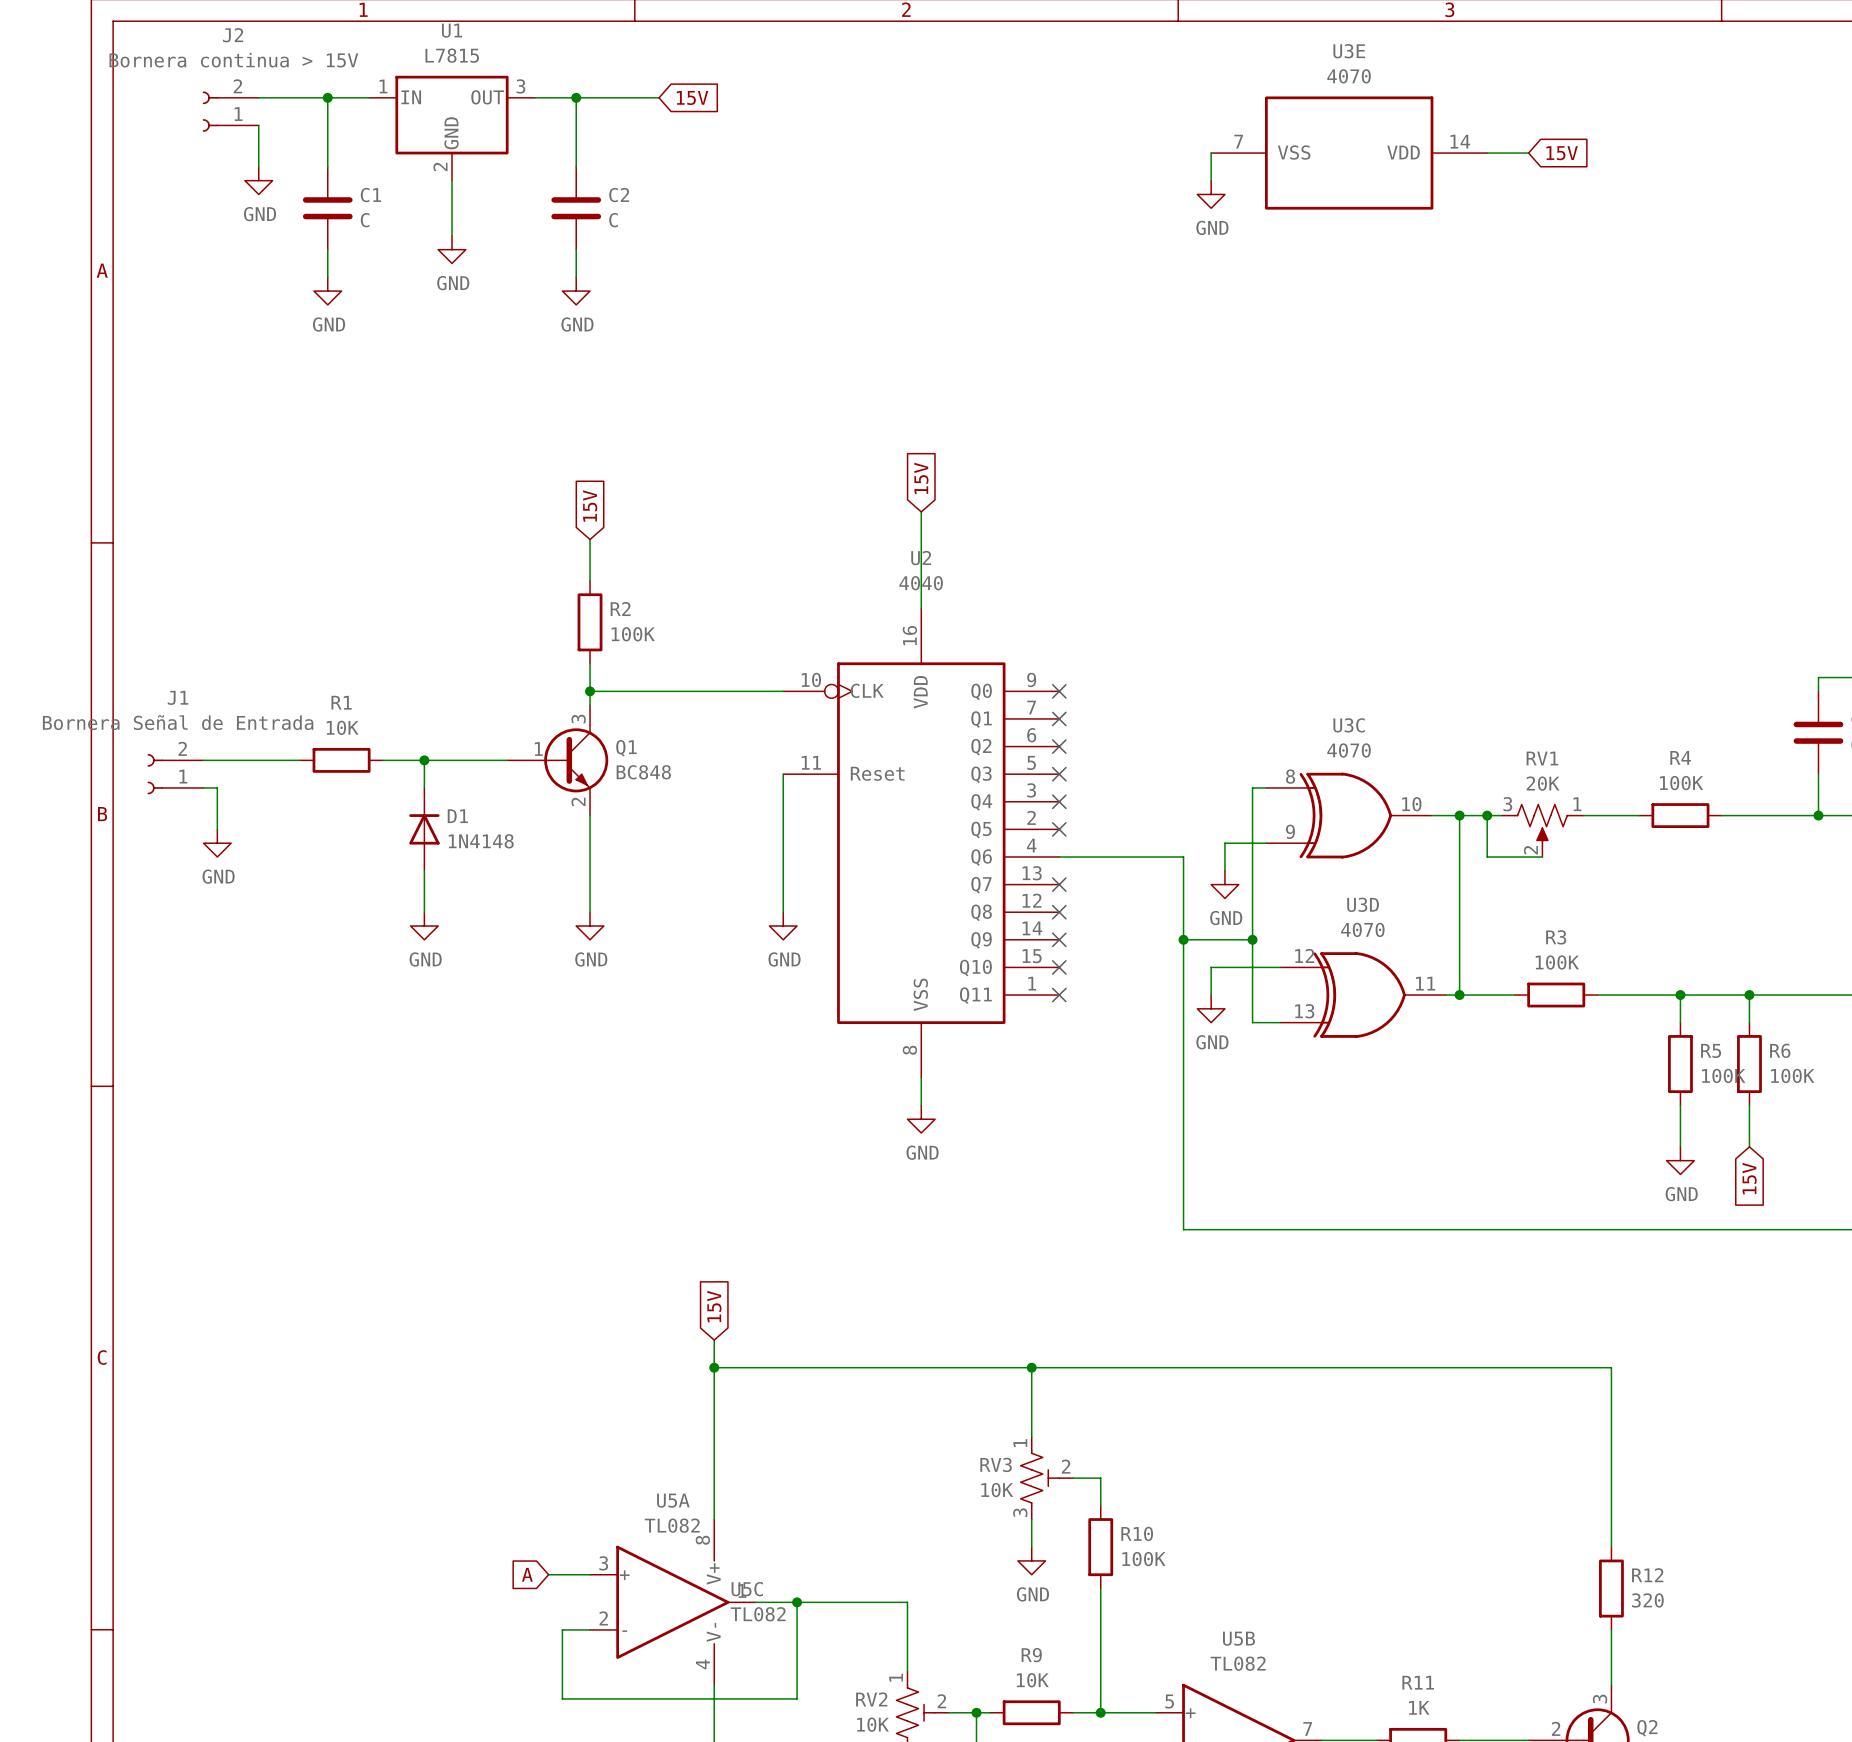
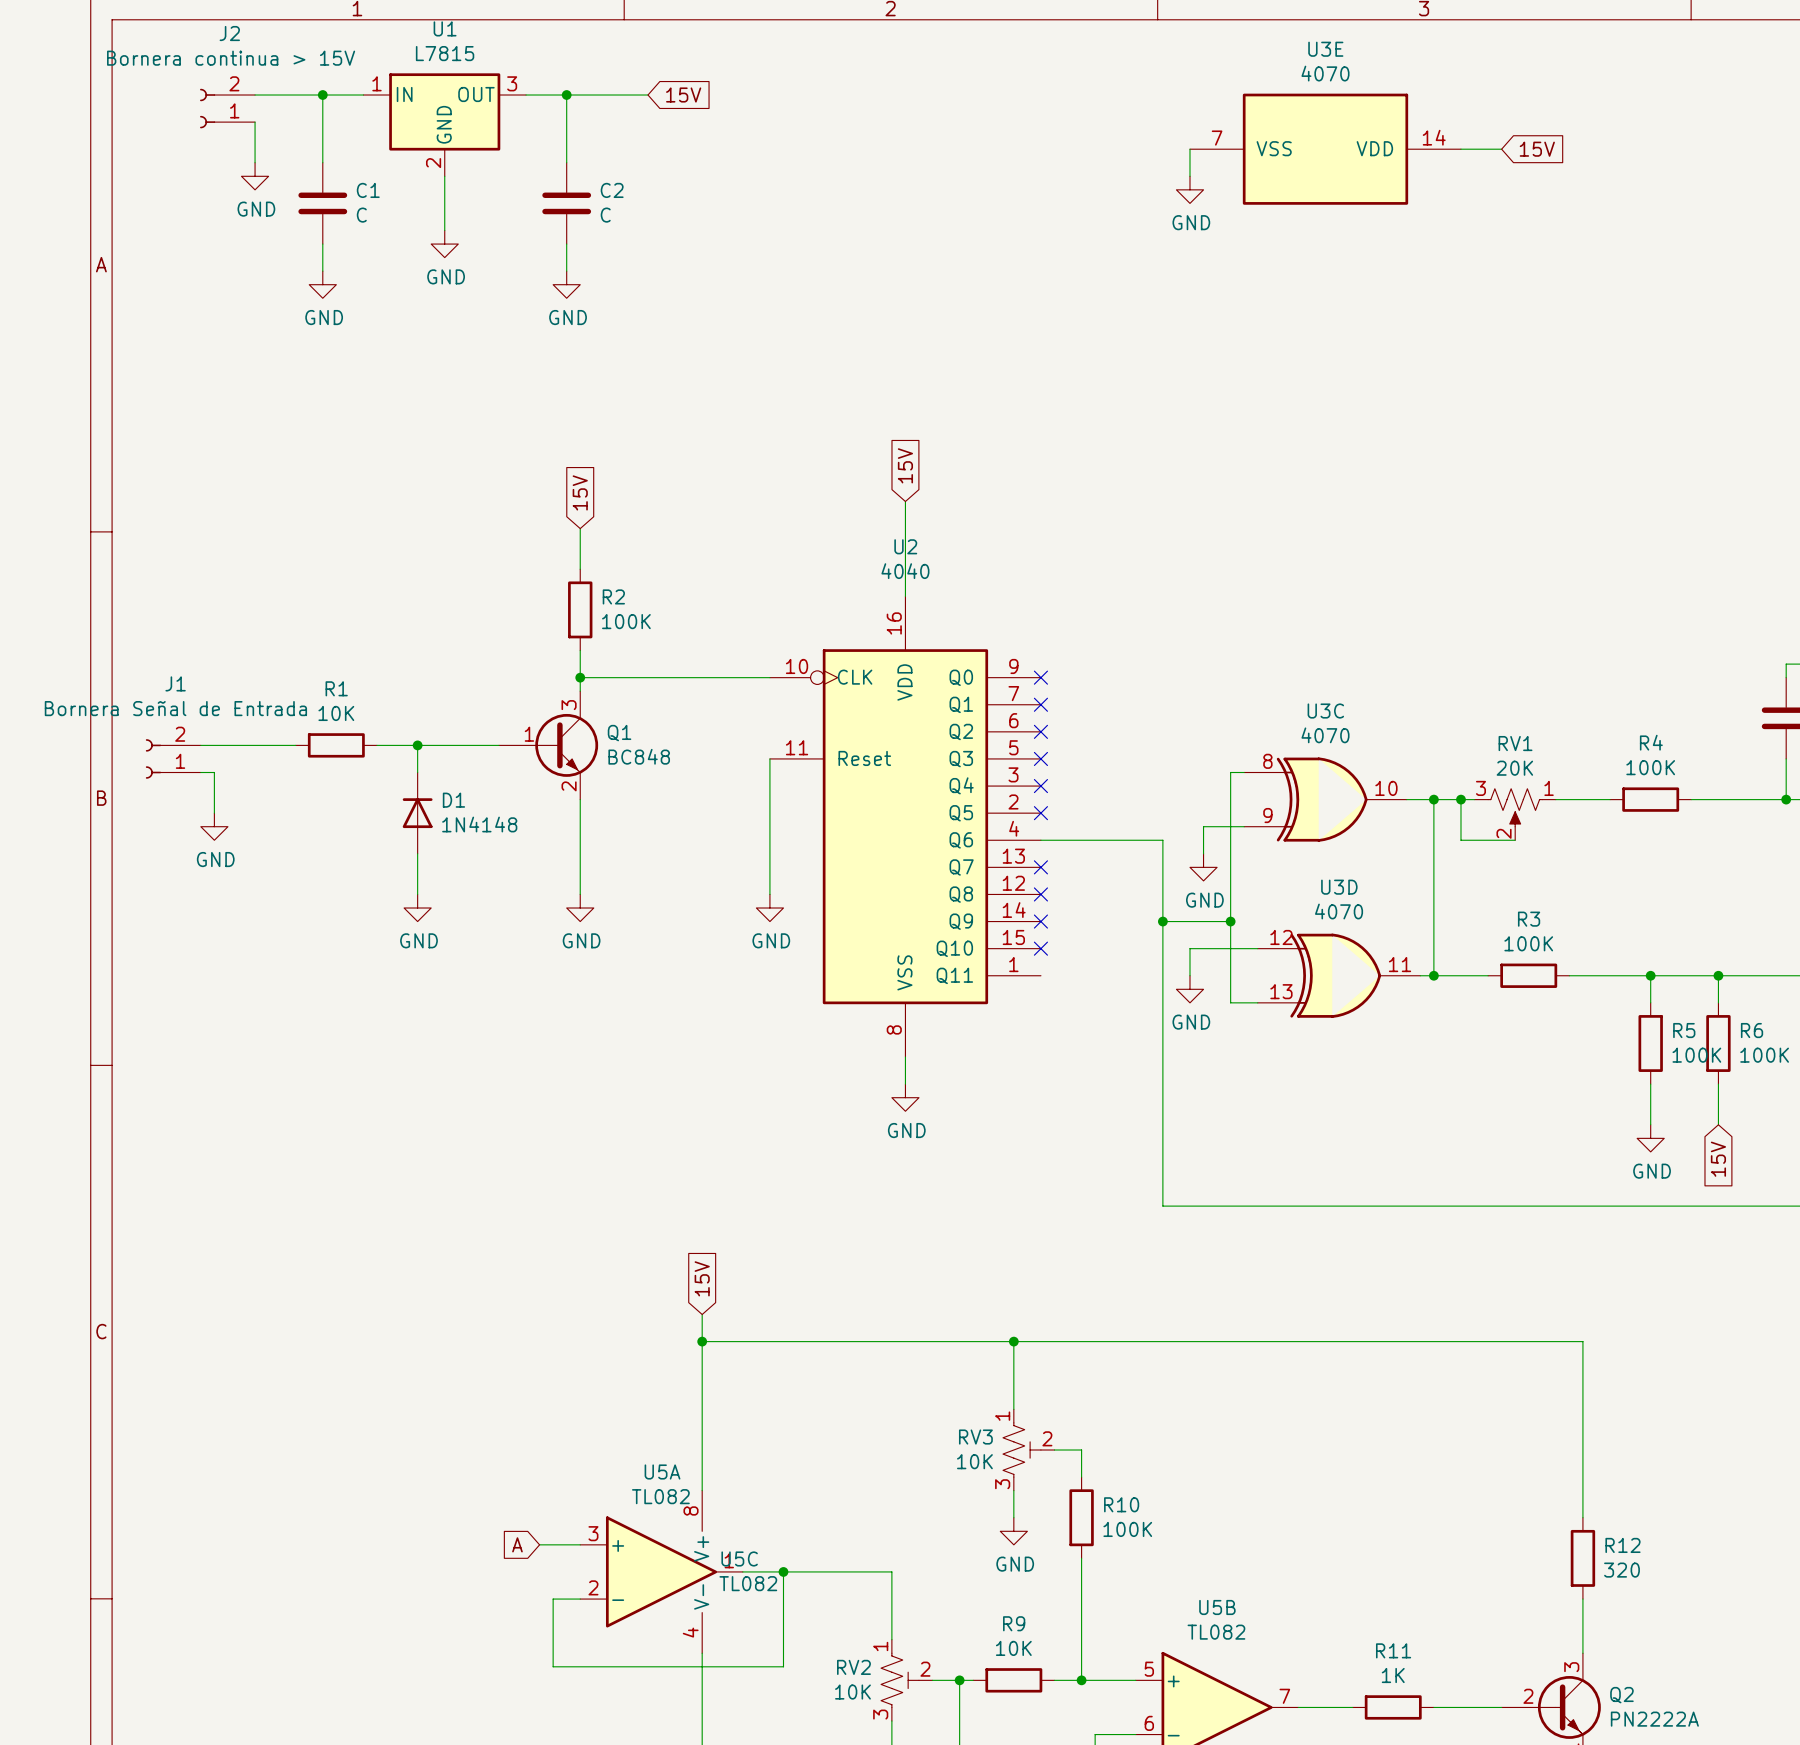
no-connect mark: (1059, 995) -> none

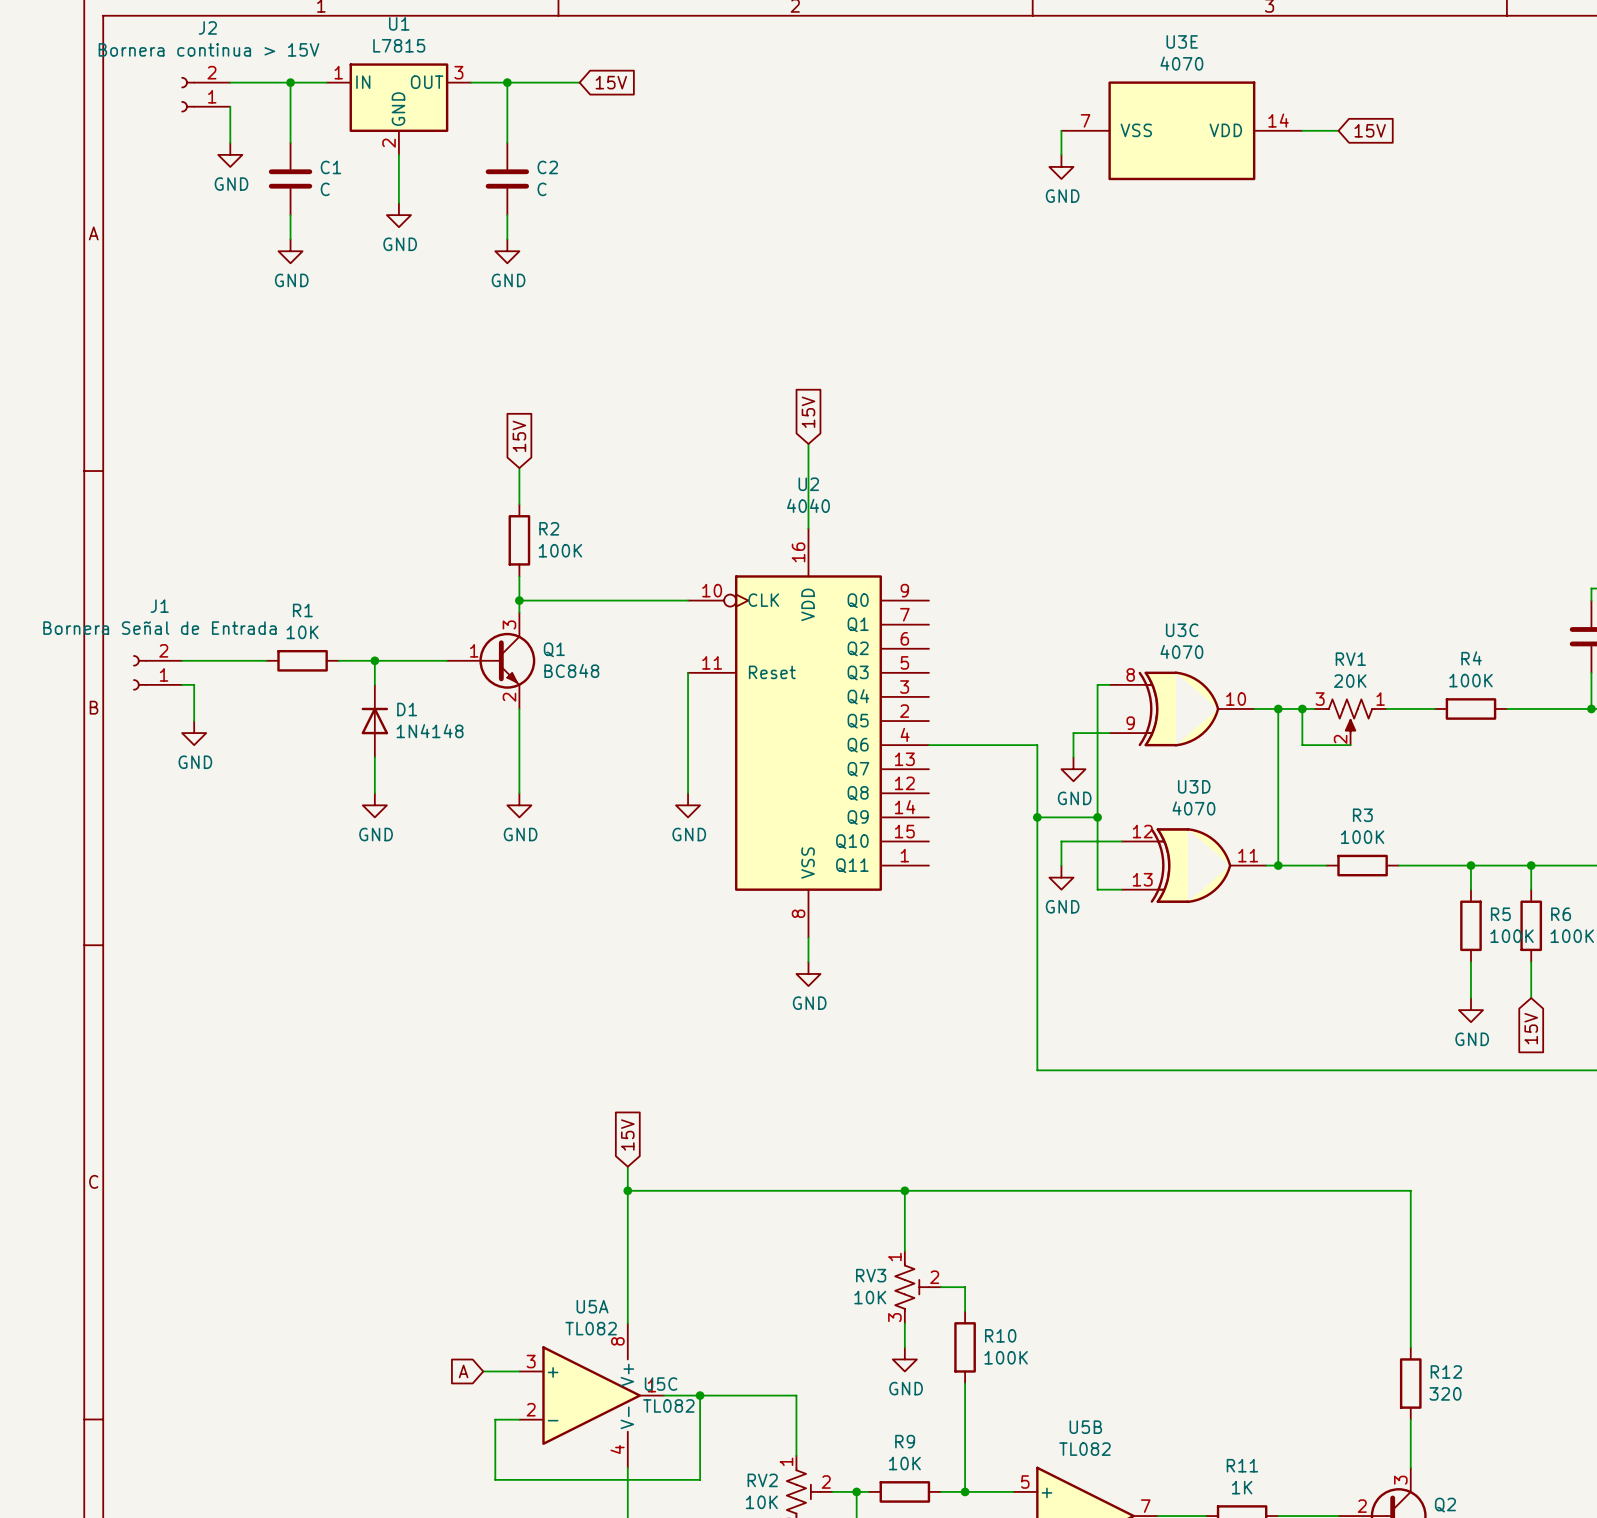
no-connect mark: (1040, 677) -> none
no-connect mark: (1040, 704) -> none
no-connect mark: (1040, 731) -> none
no-connect mark: (1040, 758) -> none
no-connect mark: (1040, 786) -> none
no-connect mark: (1040, 813) -> none
no-connect mark: (1040, 867) -> none
no-connect mark: (1040, 894) -> none
no-connect mark: (1040, 921) -> none
no-connect mark: (1040, 948) -> none

